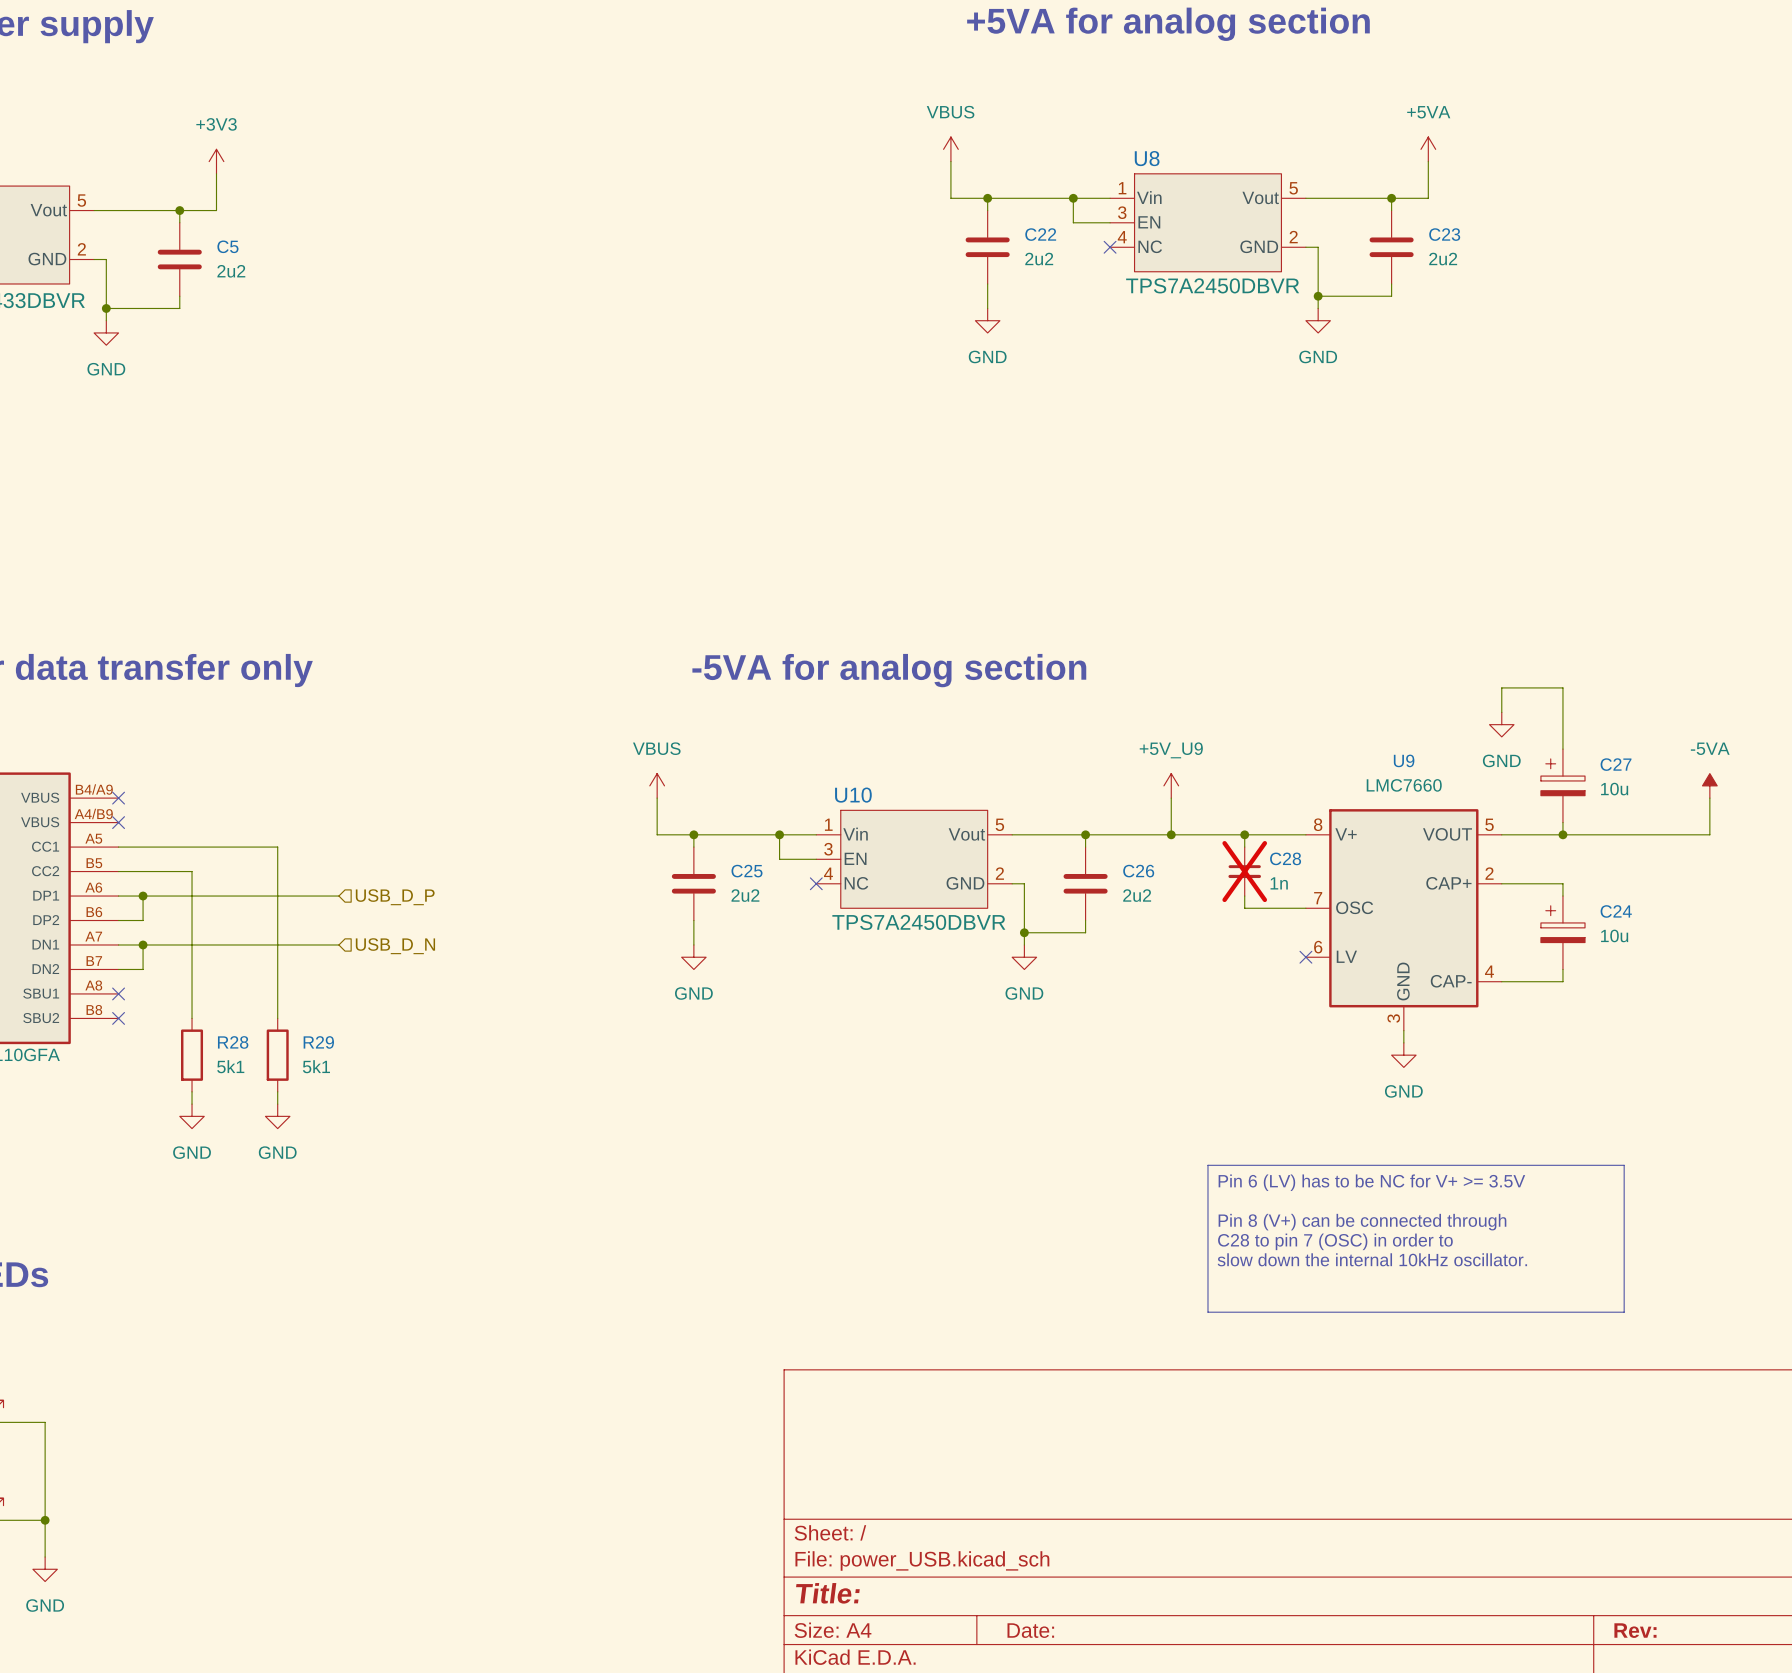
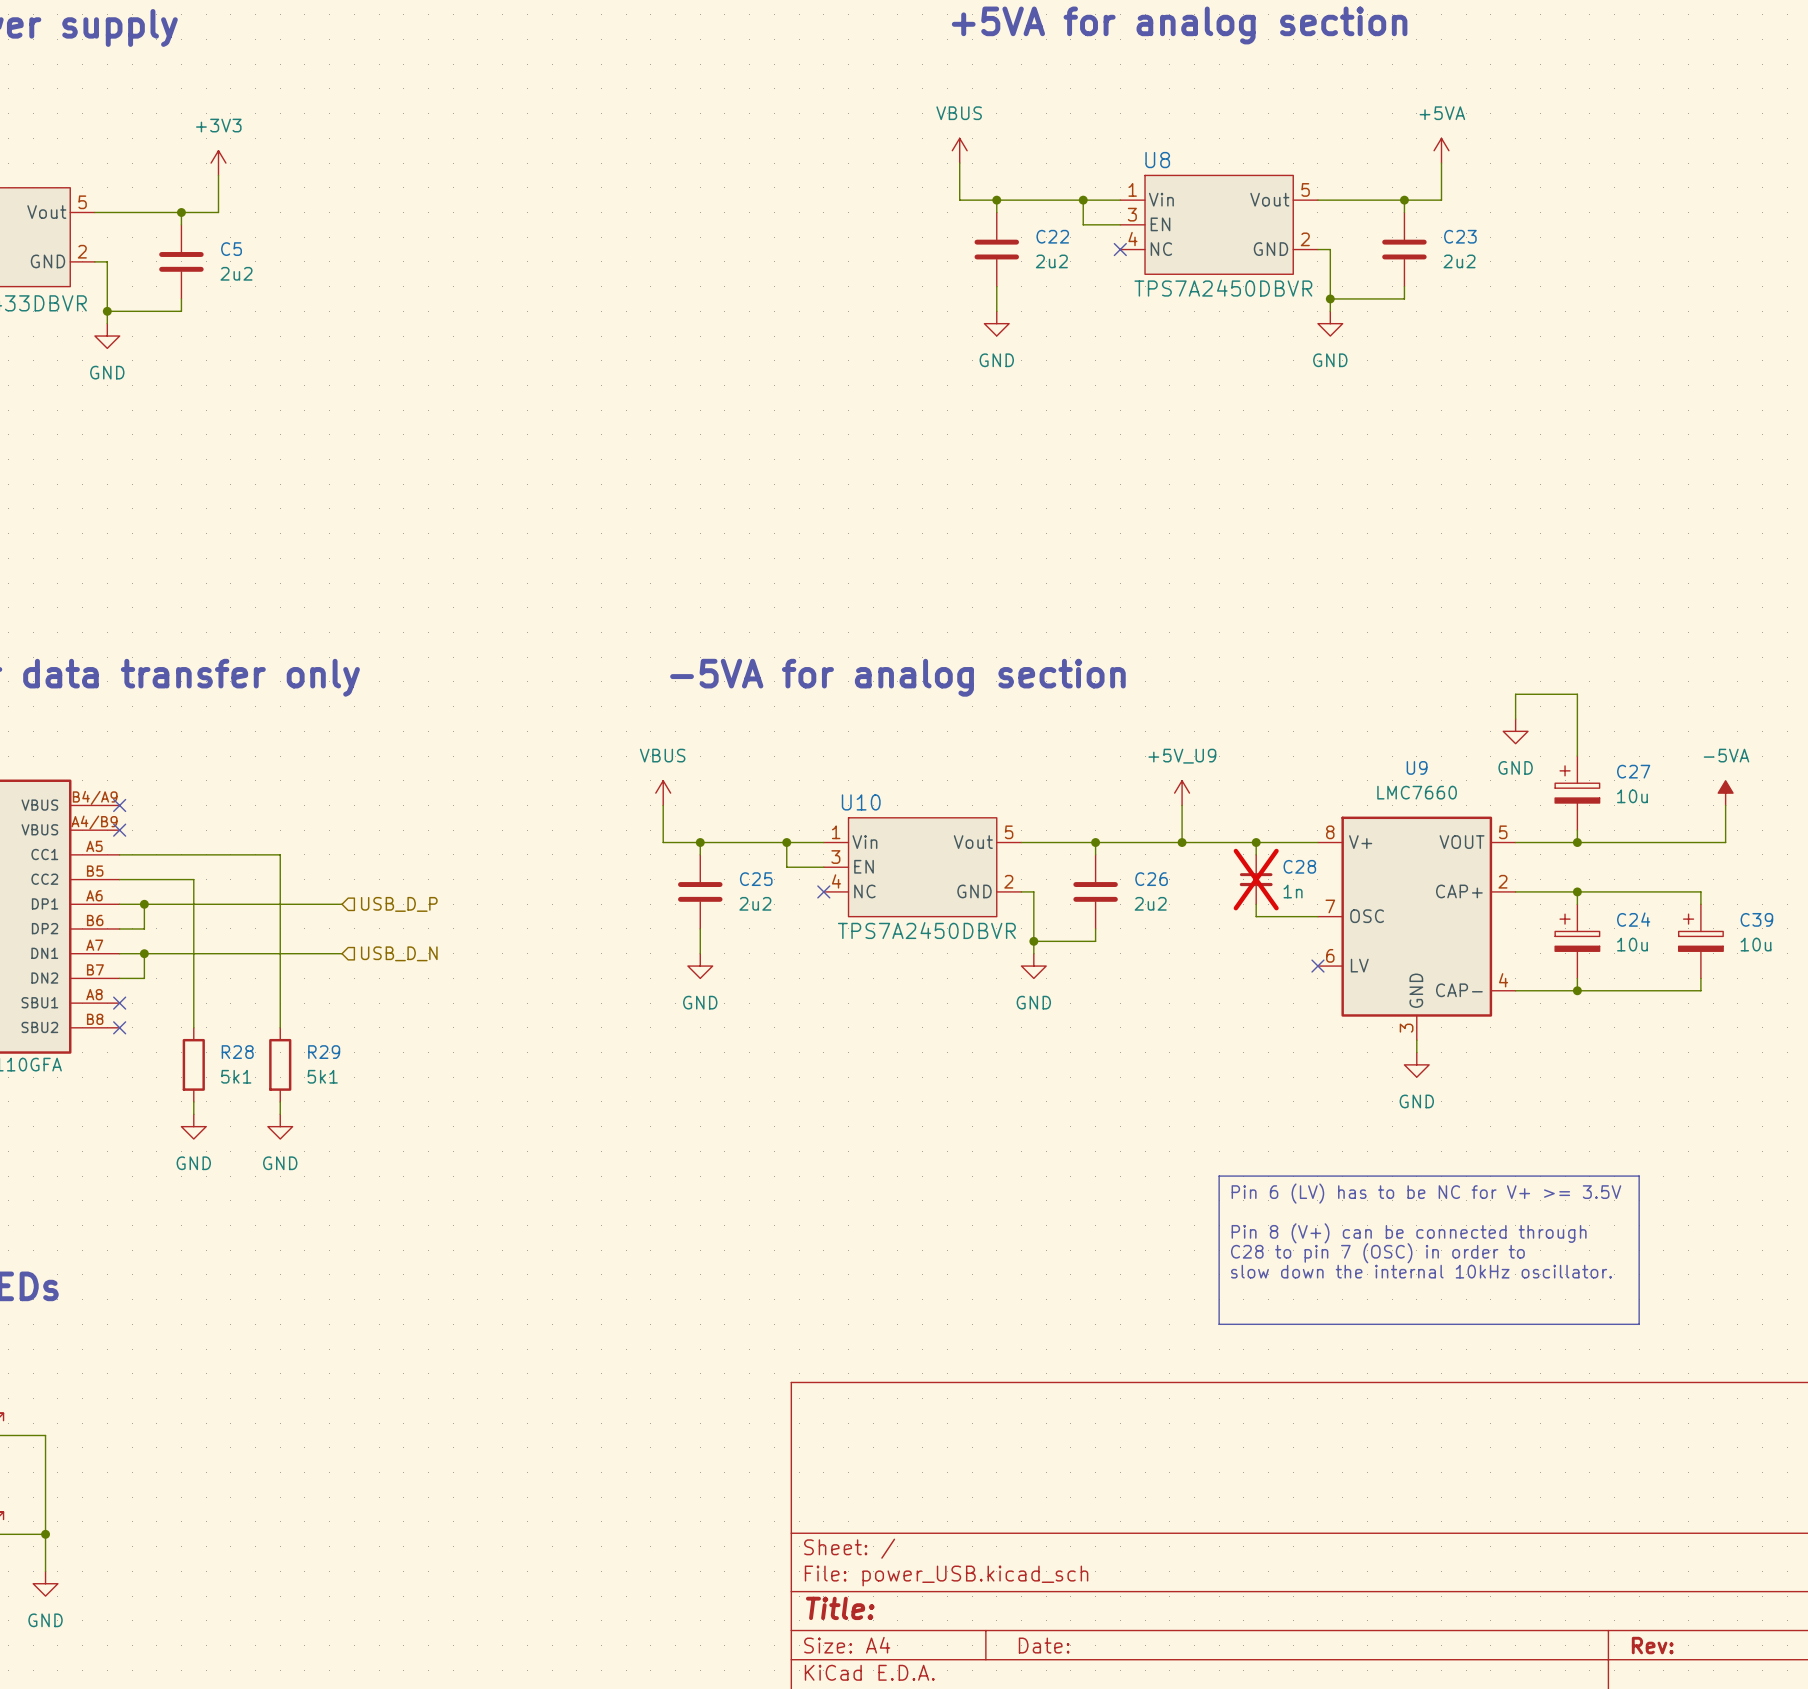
wire: none -> (1577, 891) (1700, 891) (1700, 904)
junction: none -> (1577, 891)
C39: none -> 10u (1700, 941)
wire: none -> (1700, 978) (1700, 990) (1577, 990)
junction: none -> (1577, 990)

